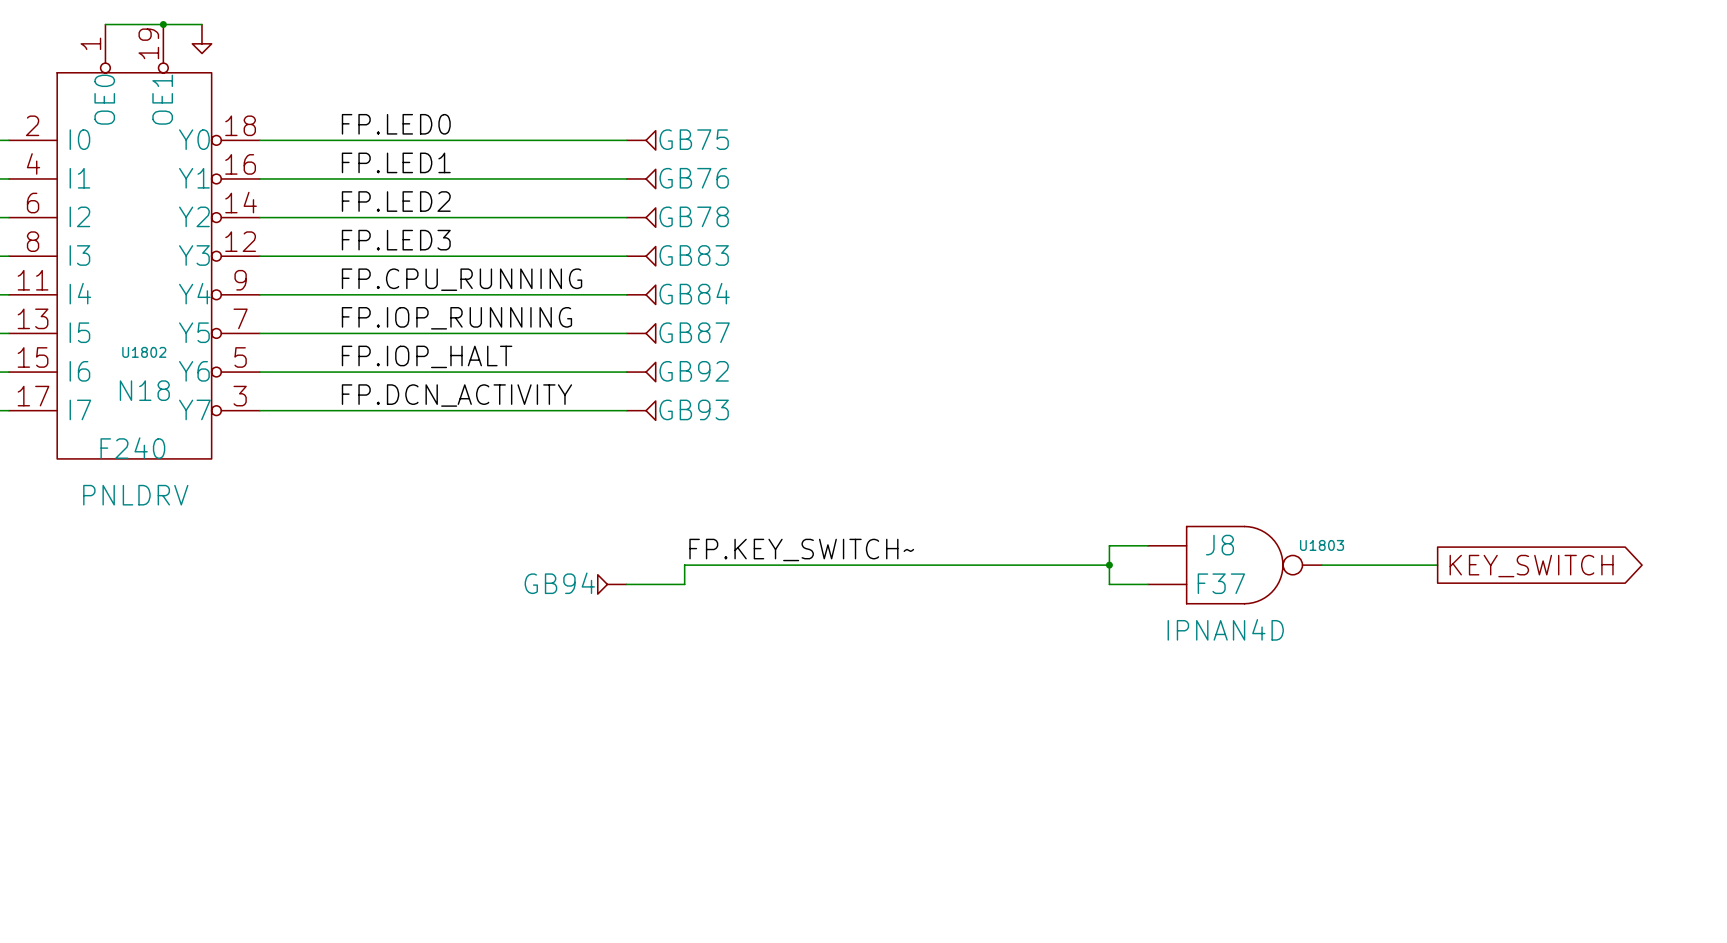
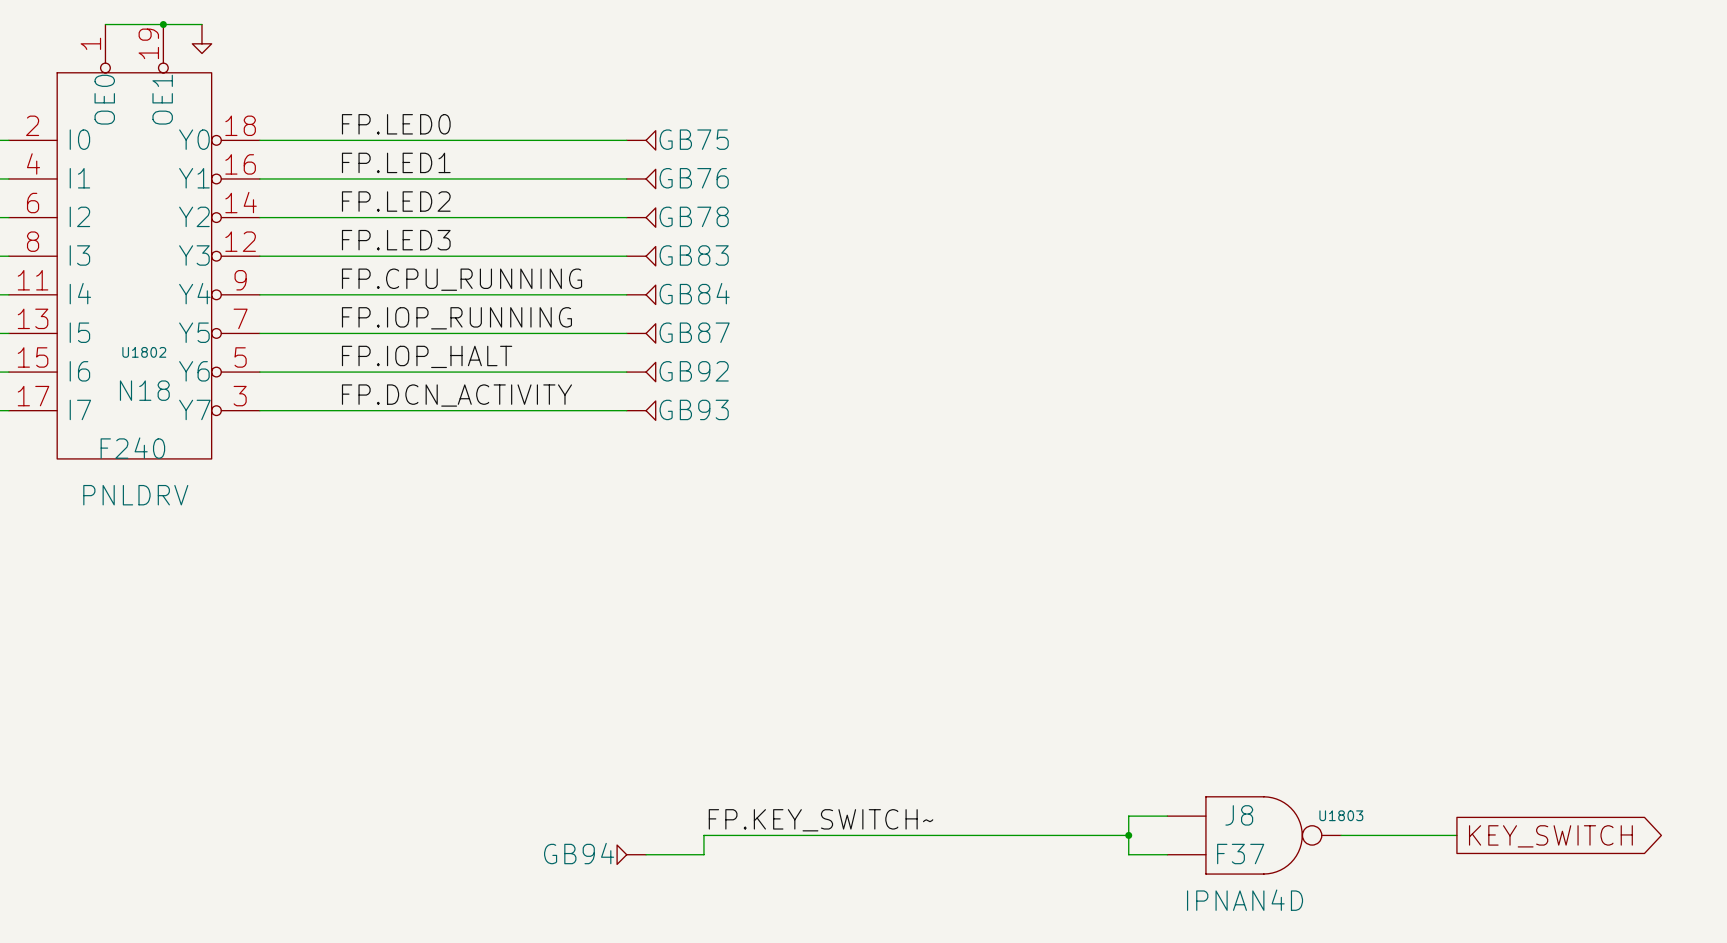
wire: (1148, 545) (1109, 545) (1109, 584) (1148, 584) -> none
label: FP.KEY_SWITCH~ (801, 549) -> none
wire: (1109, 565) (684, 565) (684, 584) (626, 584) -> none
junction: (1109, 565) -> none
U1803 position: (1234, 565) -> (1254, 835)
wire: (1321, 565) (1437, 565) -> none
global label: KEY_SWITCH (1531, 566) -> none
GB94 position: (611, 584) -> (631, 854)
wire: none -> (1167, 816) (1128, 816) (1128, 854) (1167, 854)
label: none -> FP.KEY_SWITCH~ (821, 820)
wire: none -> (1128, 835) (703, 835) (703, 854) (646, 854)
junction: none -> (1128, 835)
wire: none -> (1341, 835) (1456, 835)
global label: none -> KEY_SWITCH (1550, 836)

